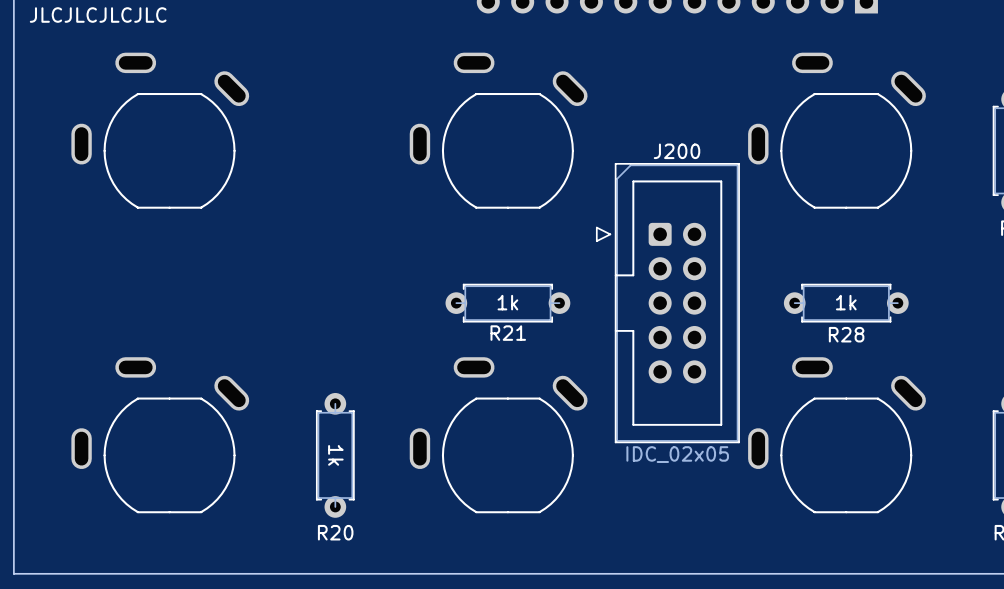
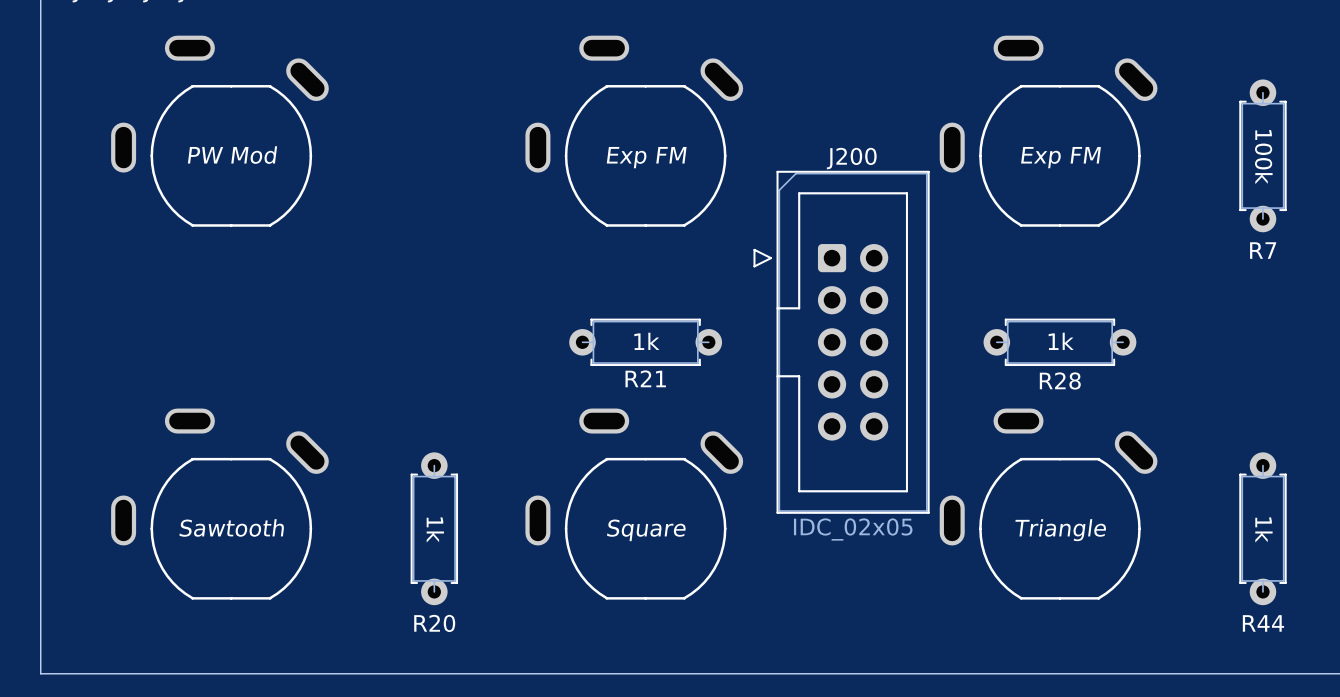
part text: none -> PW Mod (232, 155)
part text: none -> Exp FM (646, 157)
part text: none -> Exp FM (1061, 157)
part text: none -> Sawtooth (231, 527)
part text: none -> Square (646, 530)
part text: none -> Triangle (1060, 530)

